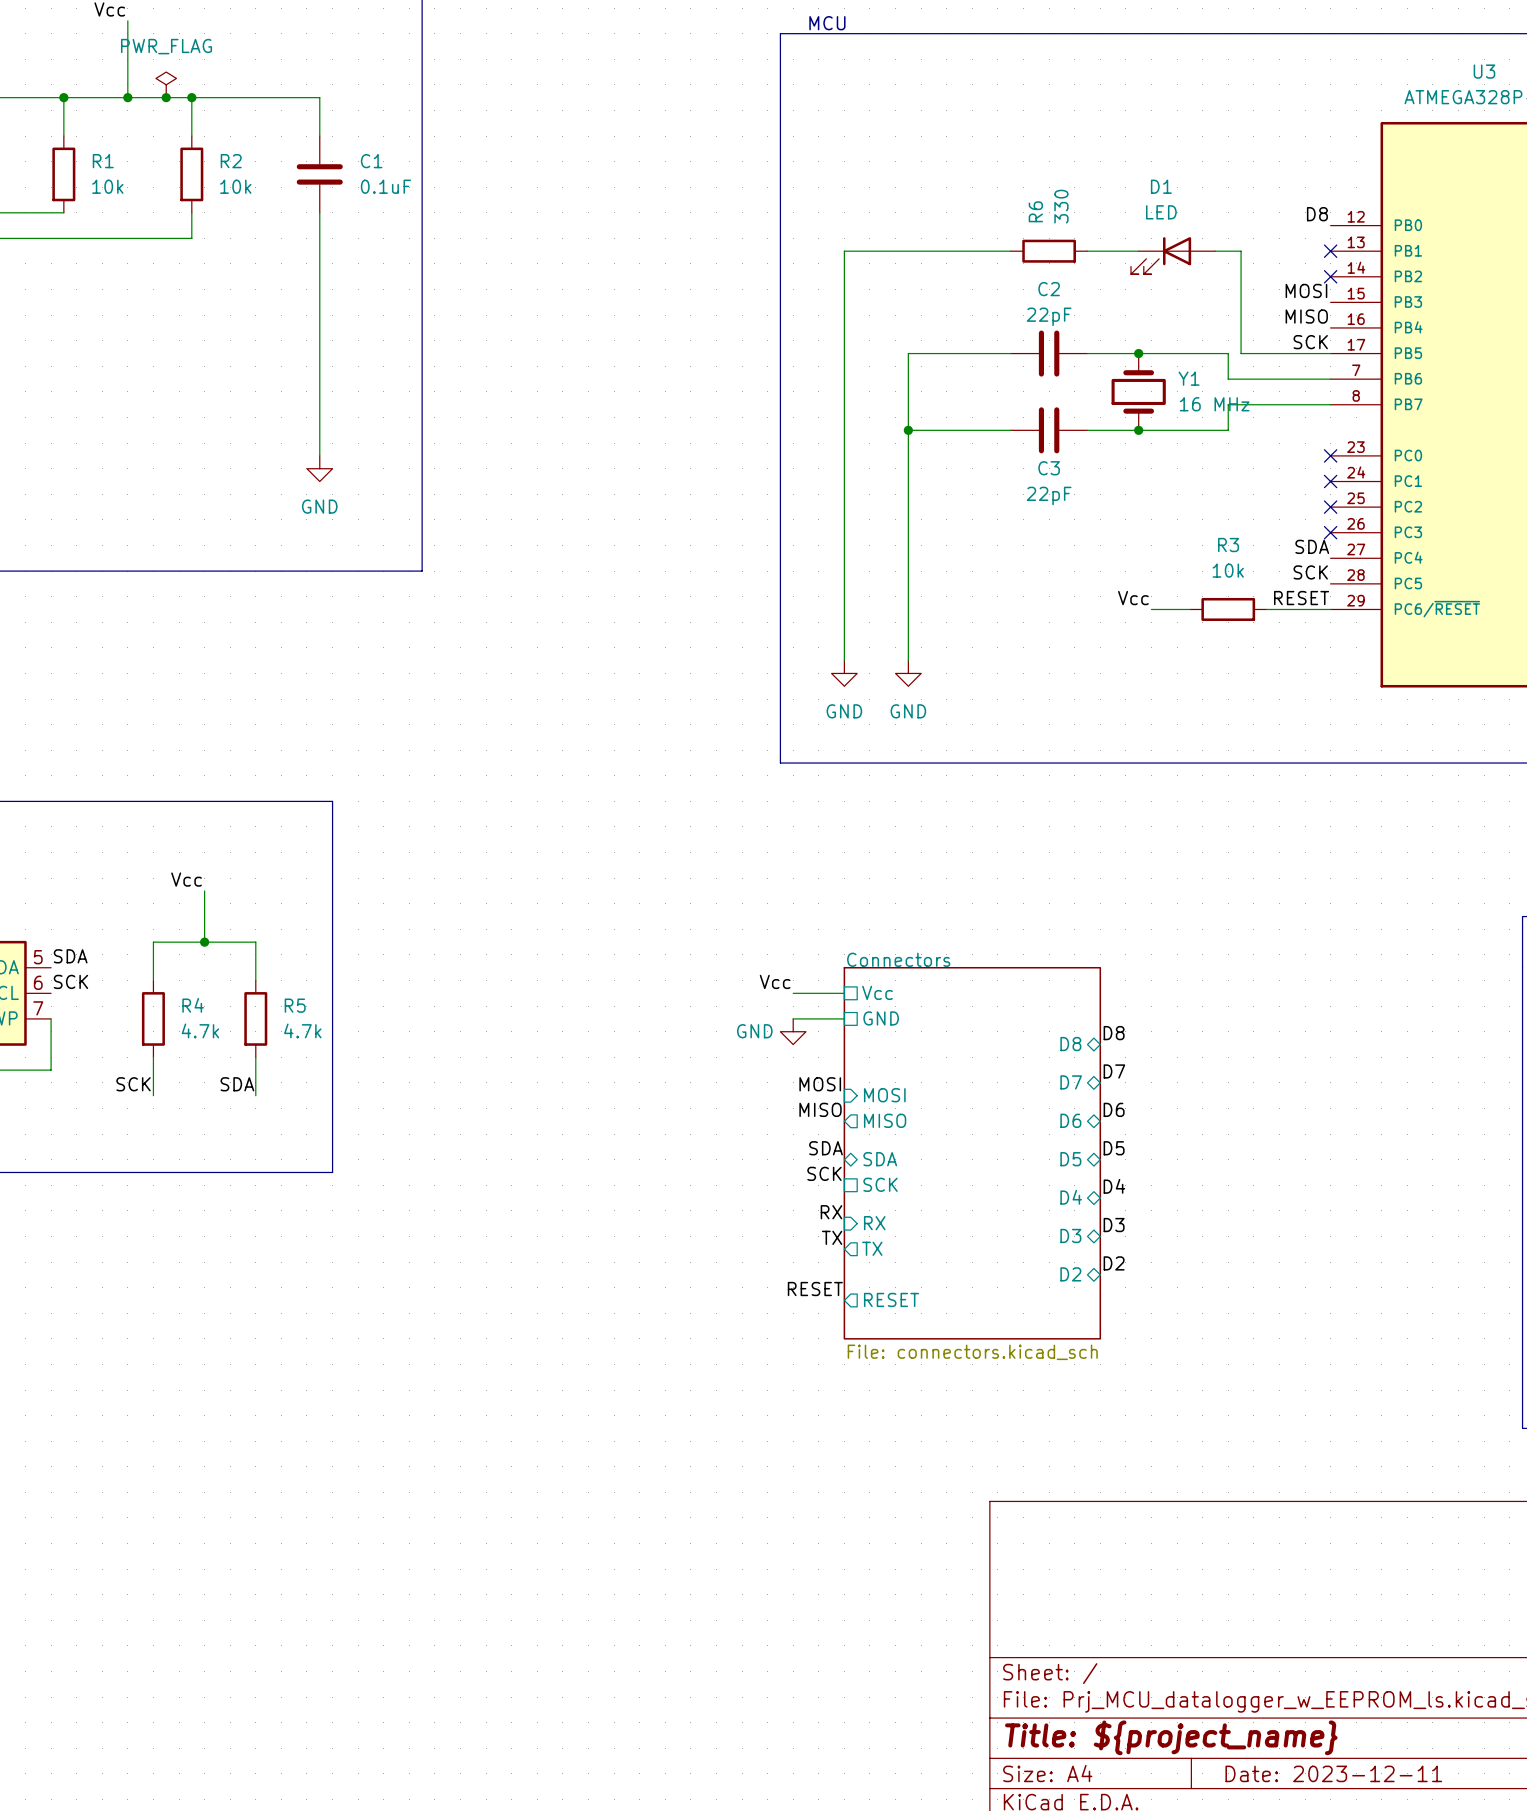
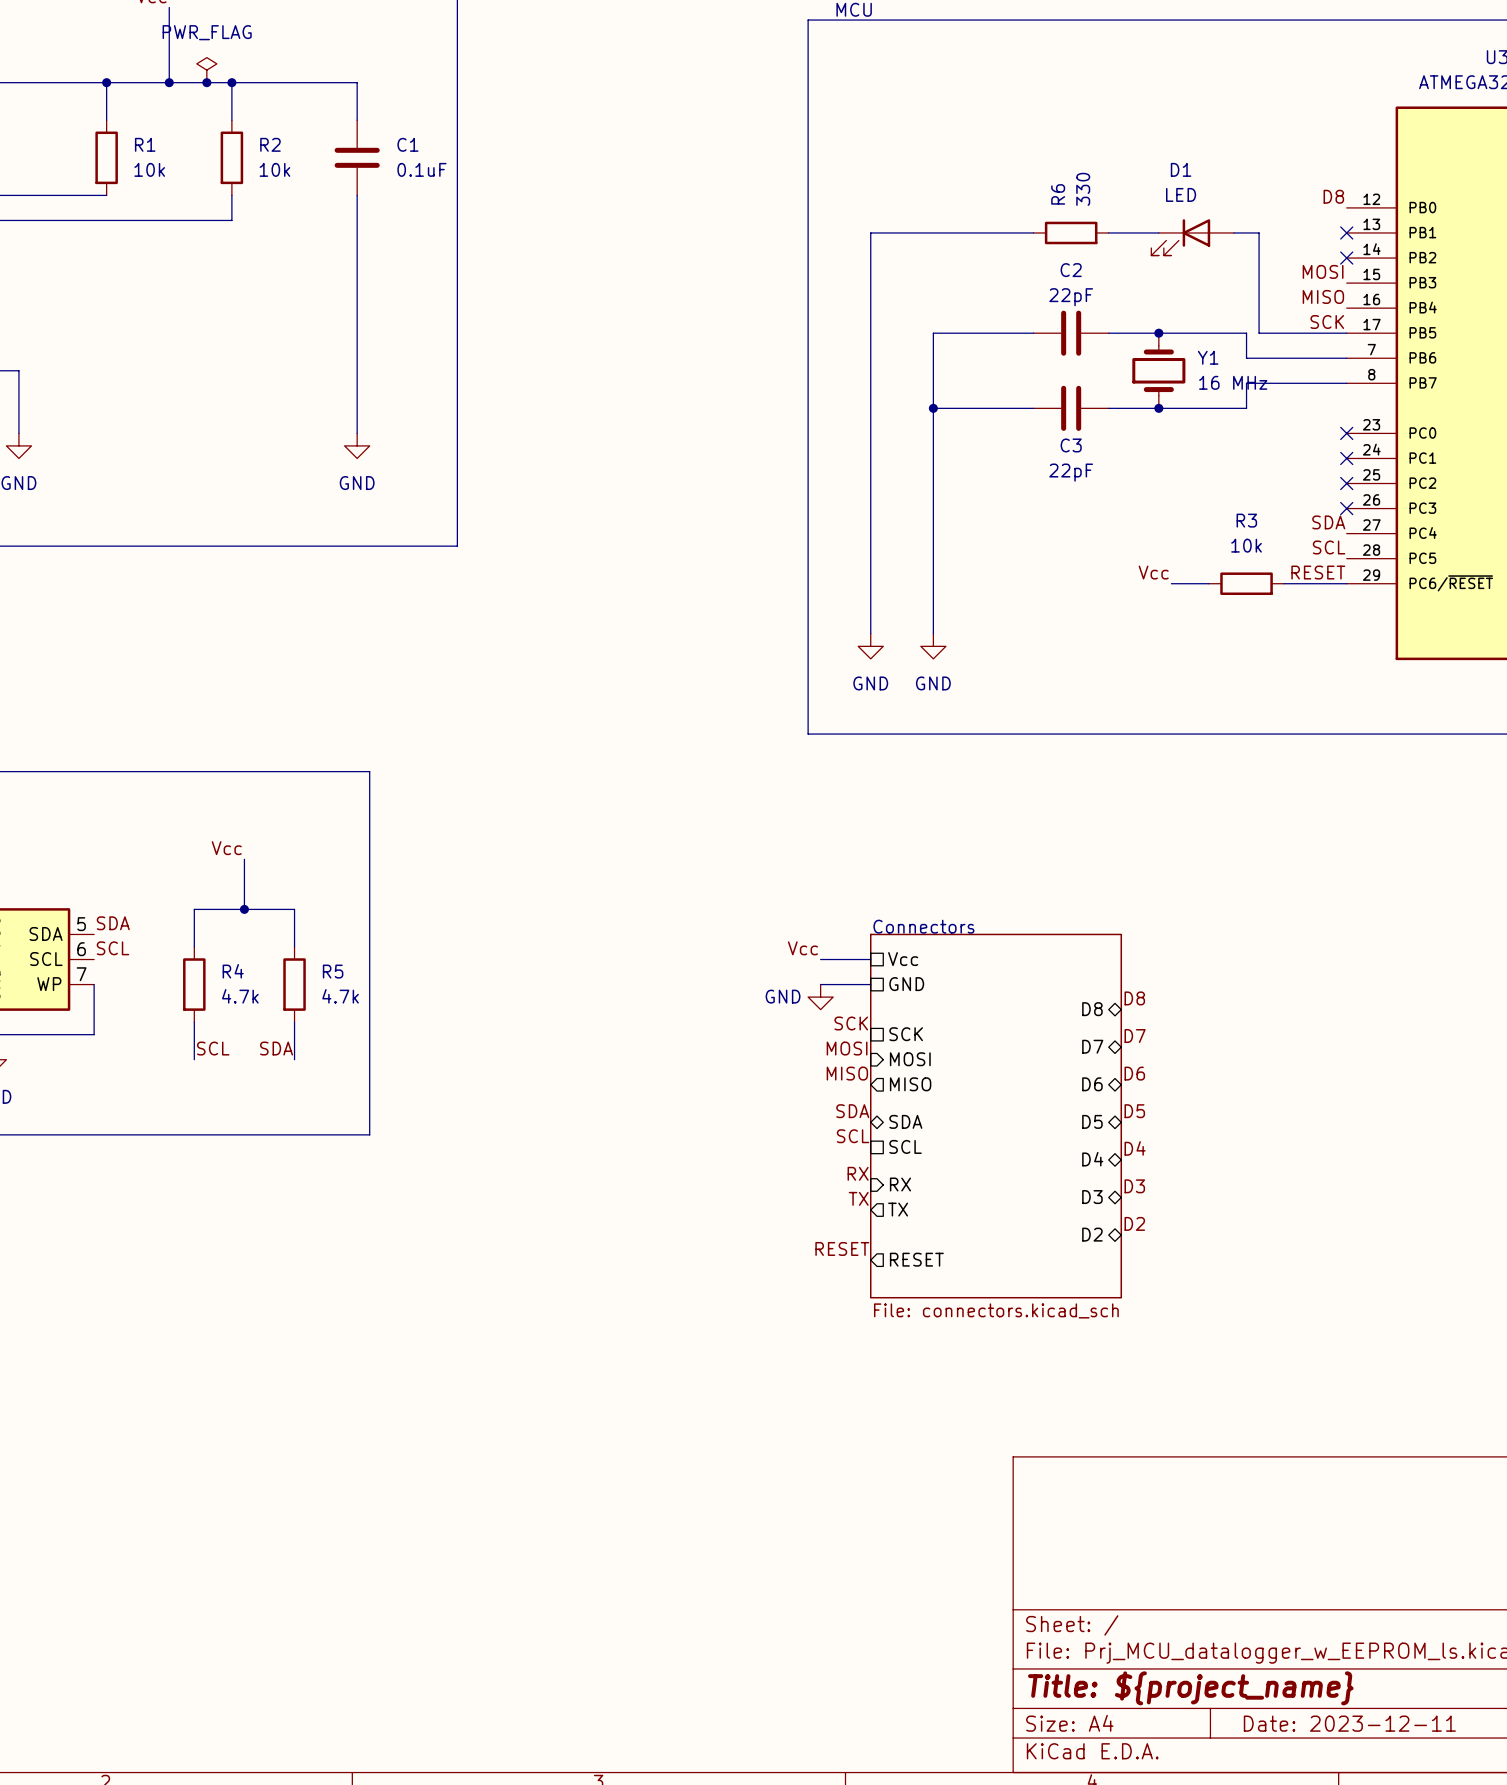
label: SCK (1310, 572) -> SCL (1329, 547)
label: SCK (70, 981) -> SCL (112, 948)
label: none -> SCK (851, 1023)
sheet pin: none -> SCK (906, 1034)
label: SCK (133, 1084) -> SCL (213, 1048)
label: SCK (824, 1173) -> SCL (853, 1136)
sheet pin: SCK (880, 1184) -> SCL (905, 1146)

